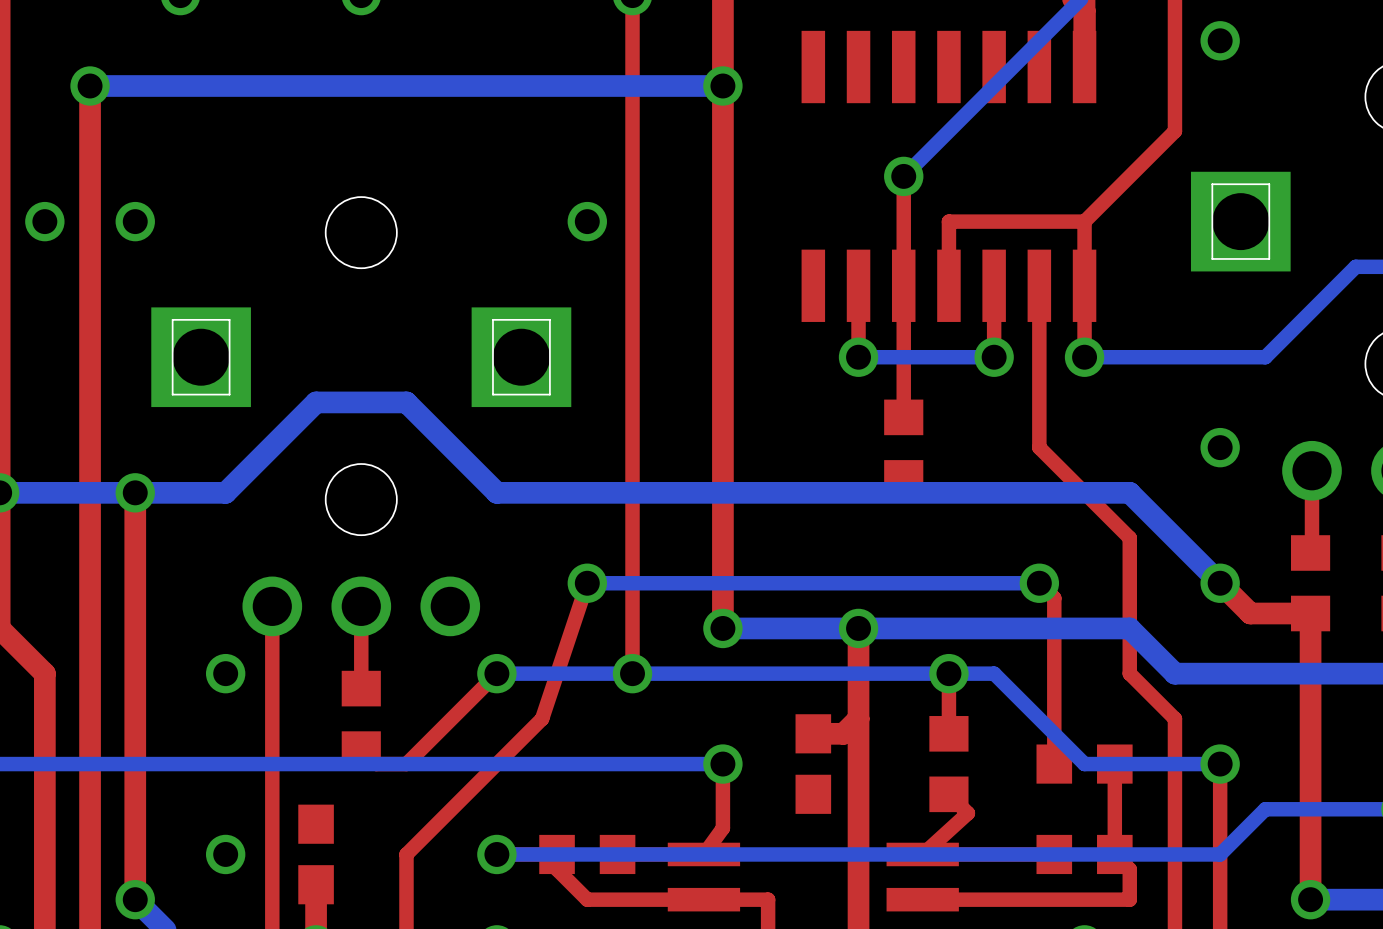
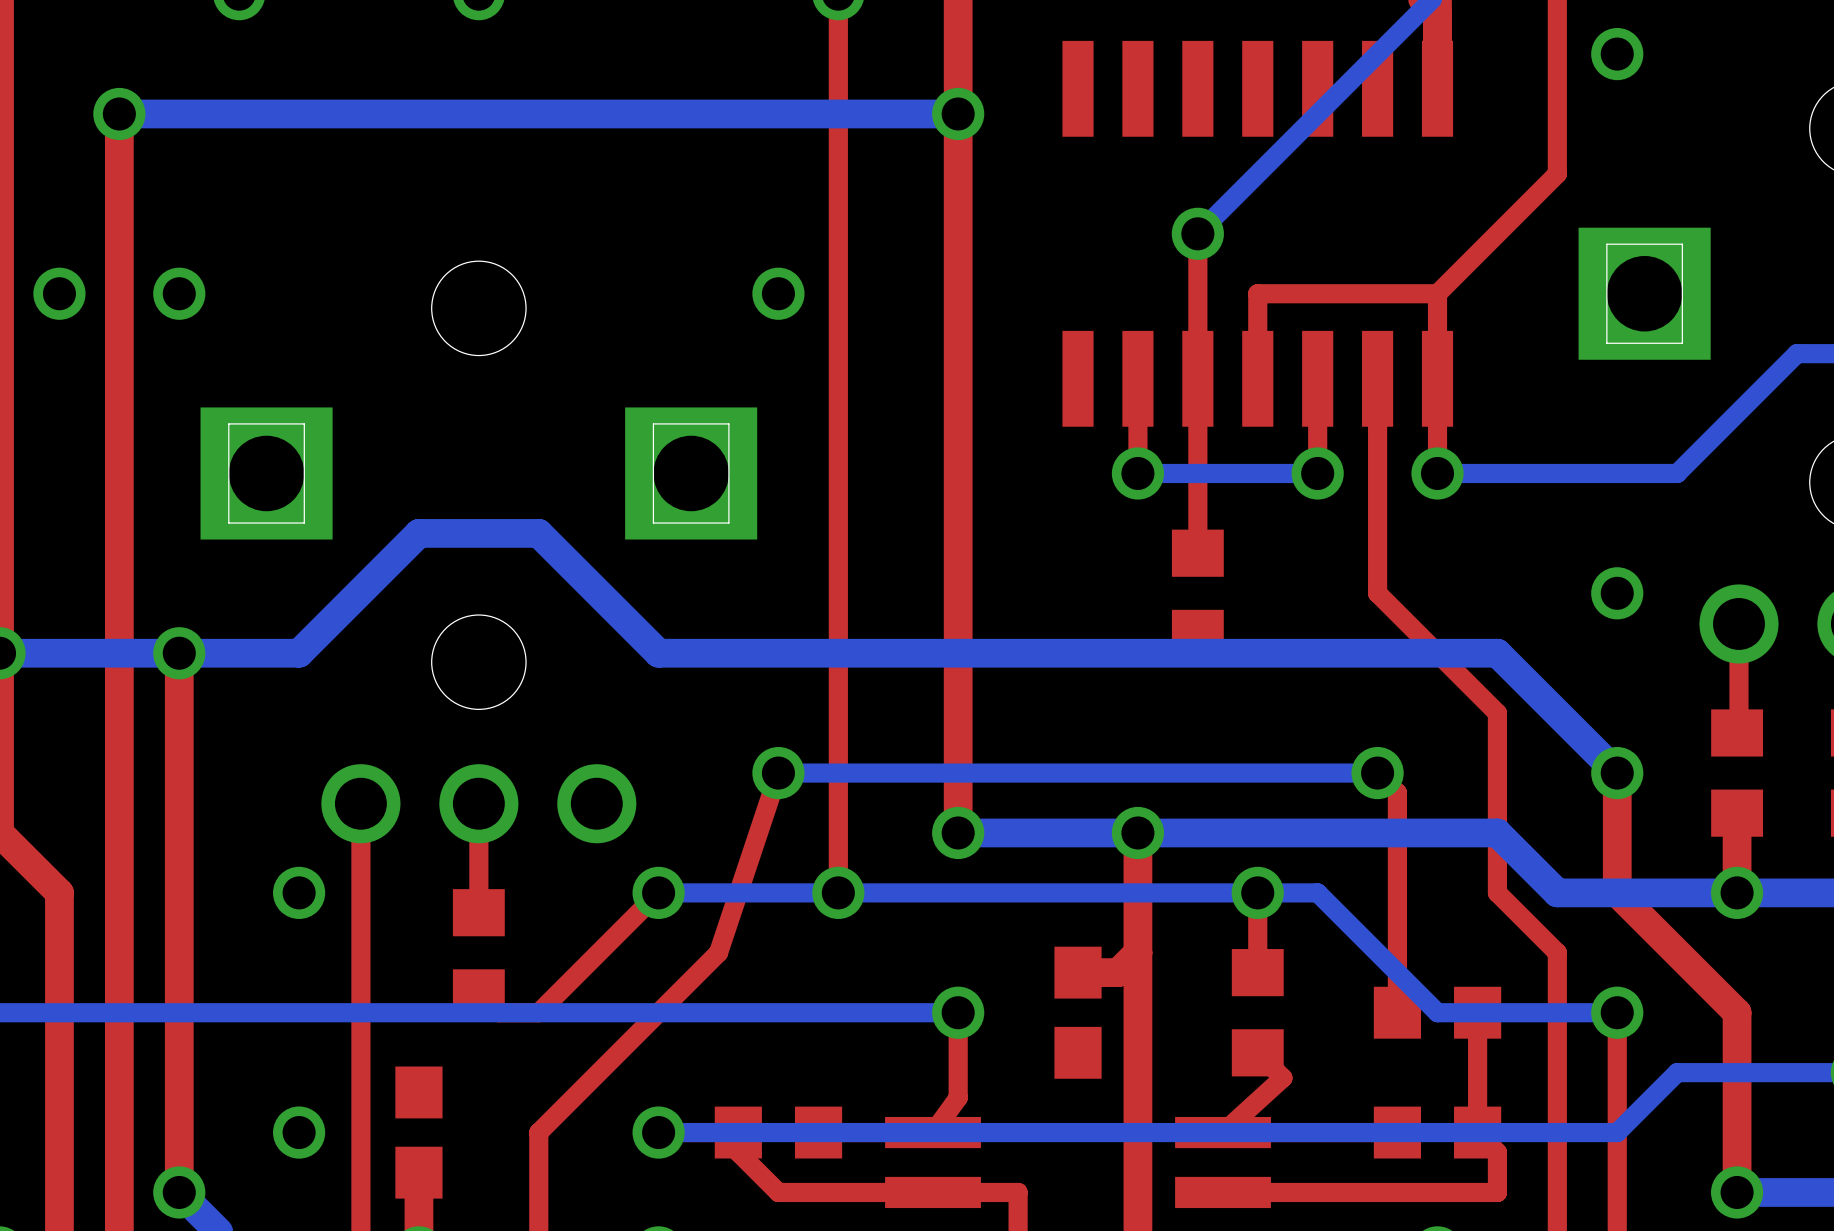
top track: (1220, 583) (1250, 613) (1310, 613) -> none
top track: (1310, 673) (1310, 764) -> (1617, 773) (1617, 892) (1737, 1012)
via: none -> (1737, 892)

